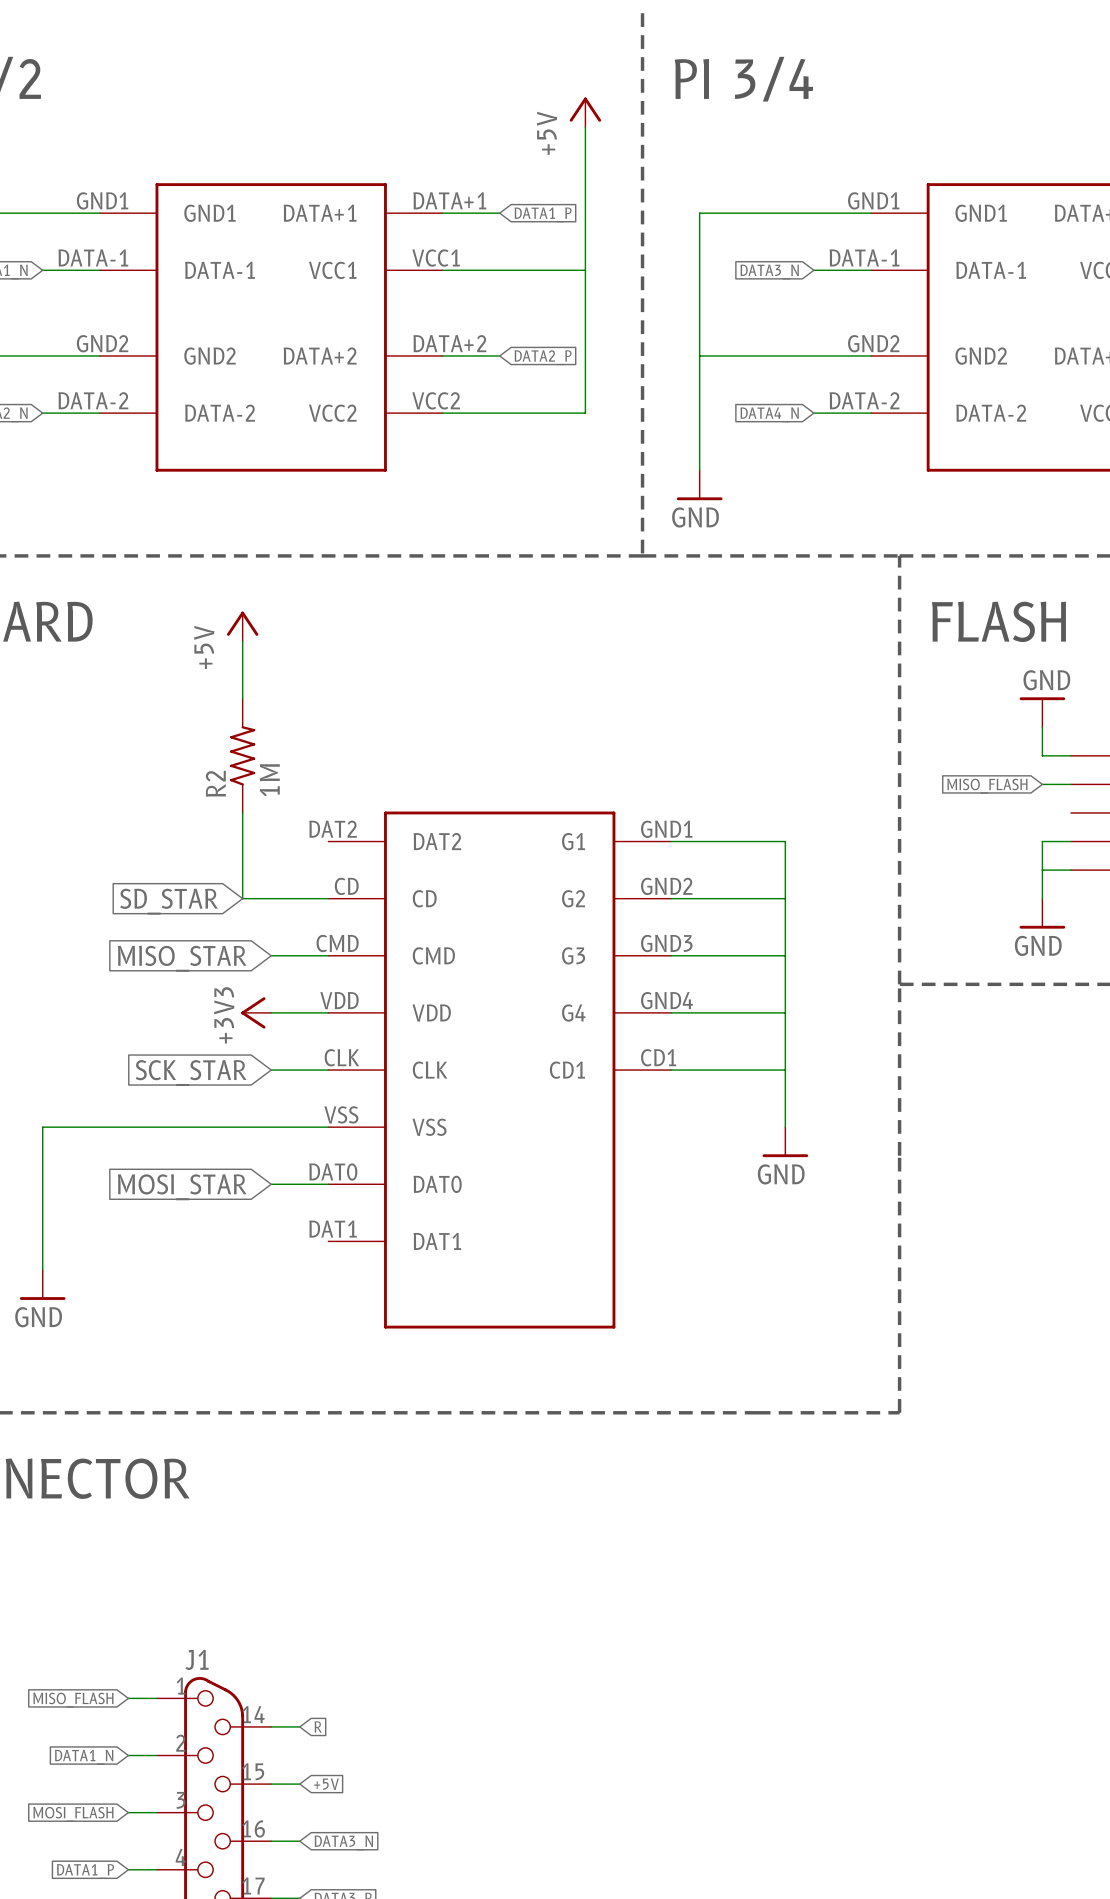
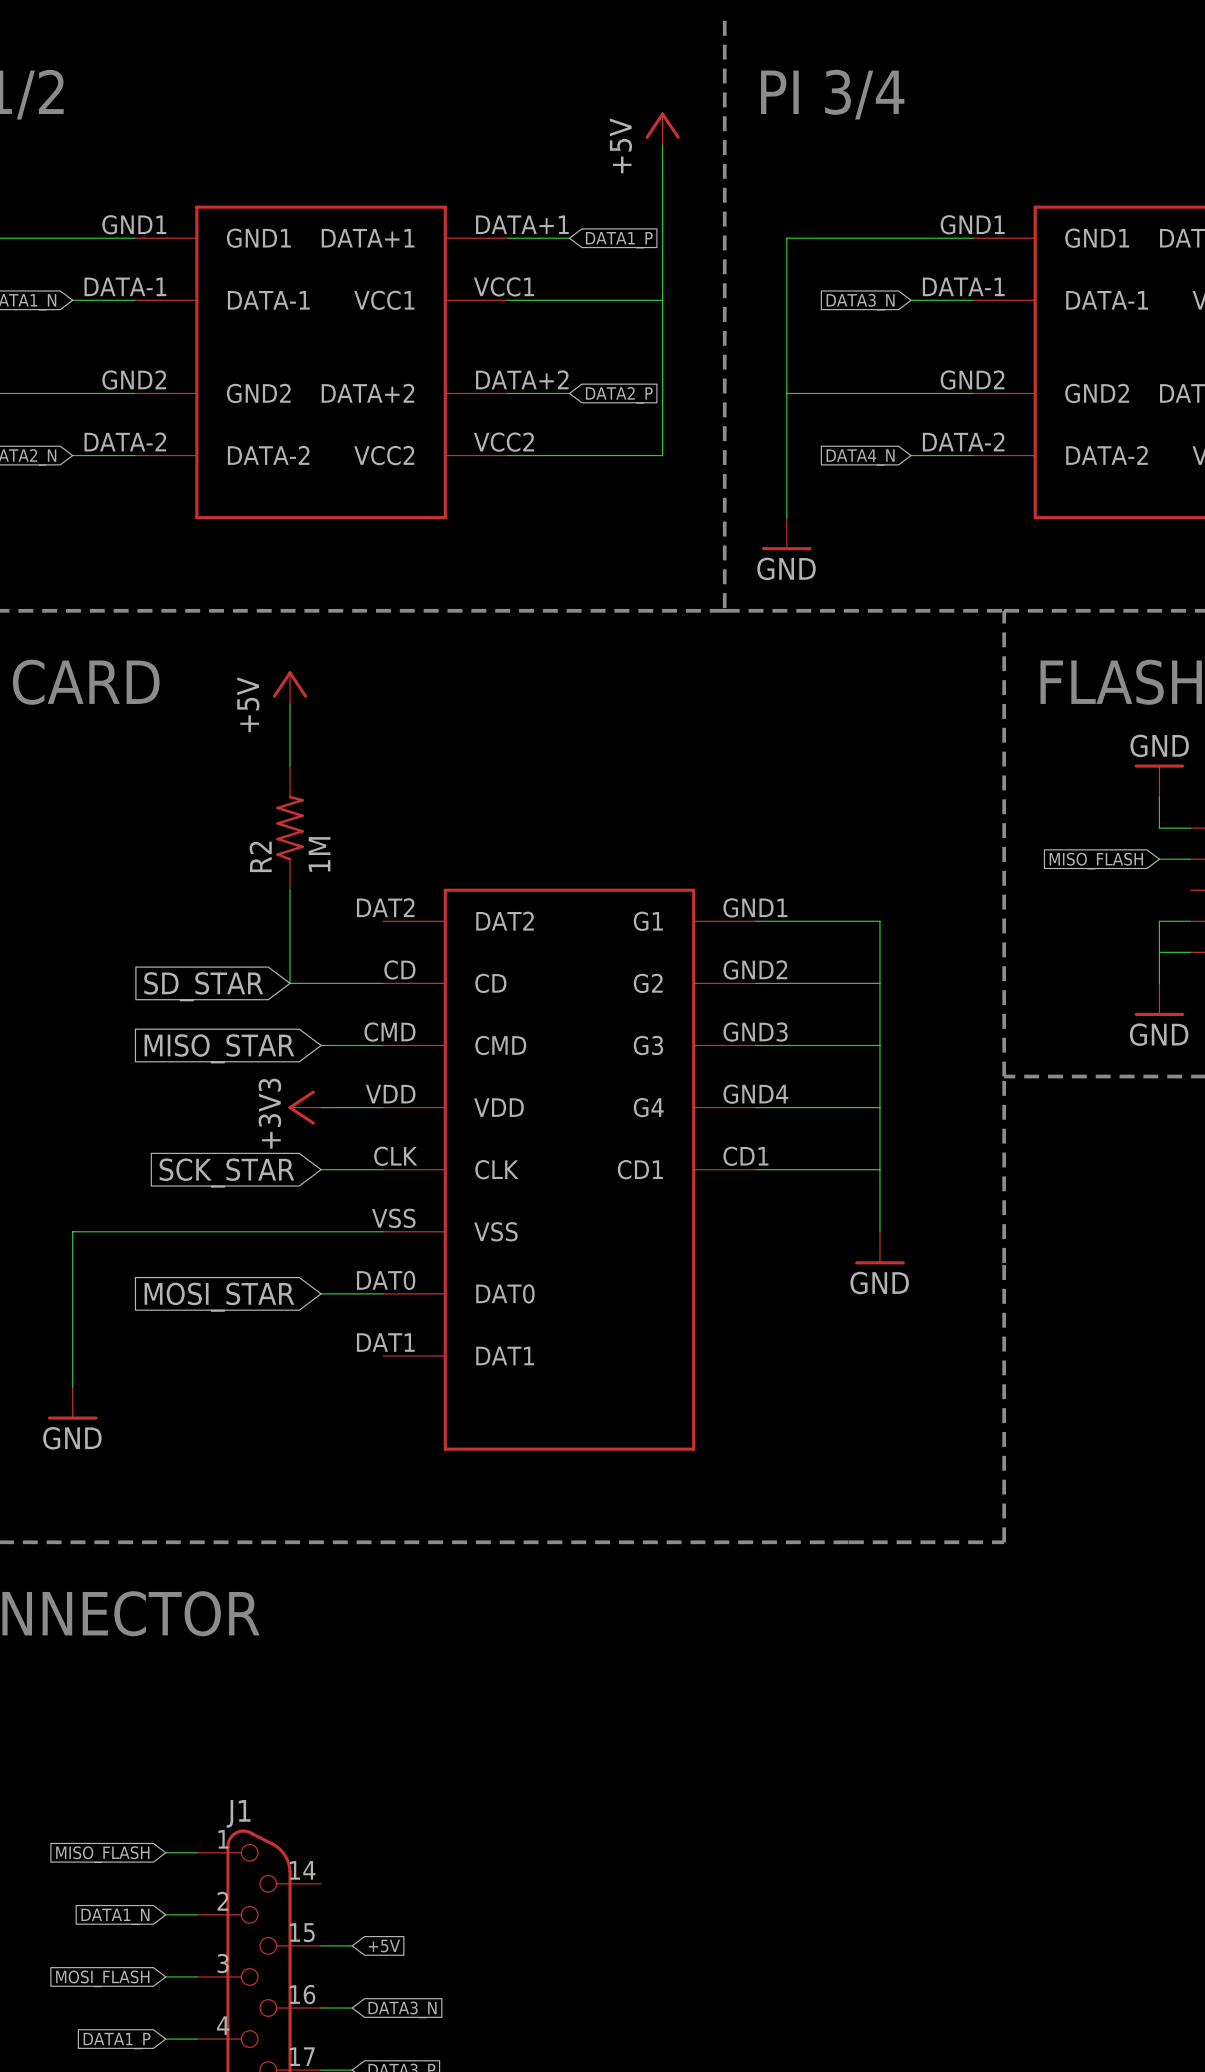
wire: (271, 1726) (299, 1726) -> none
global label: R (318, 1726) -> none

